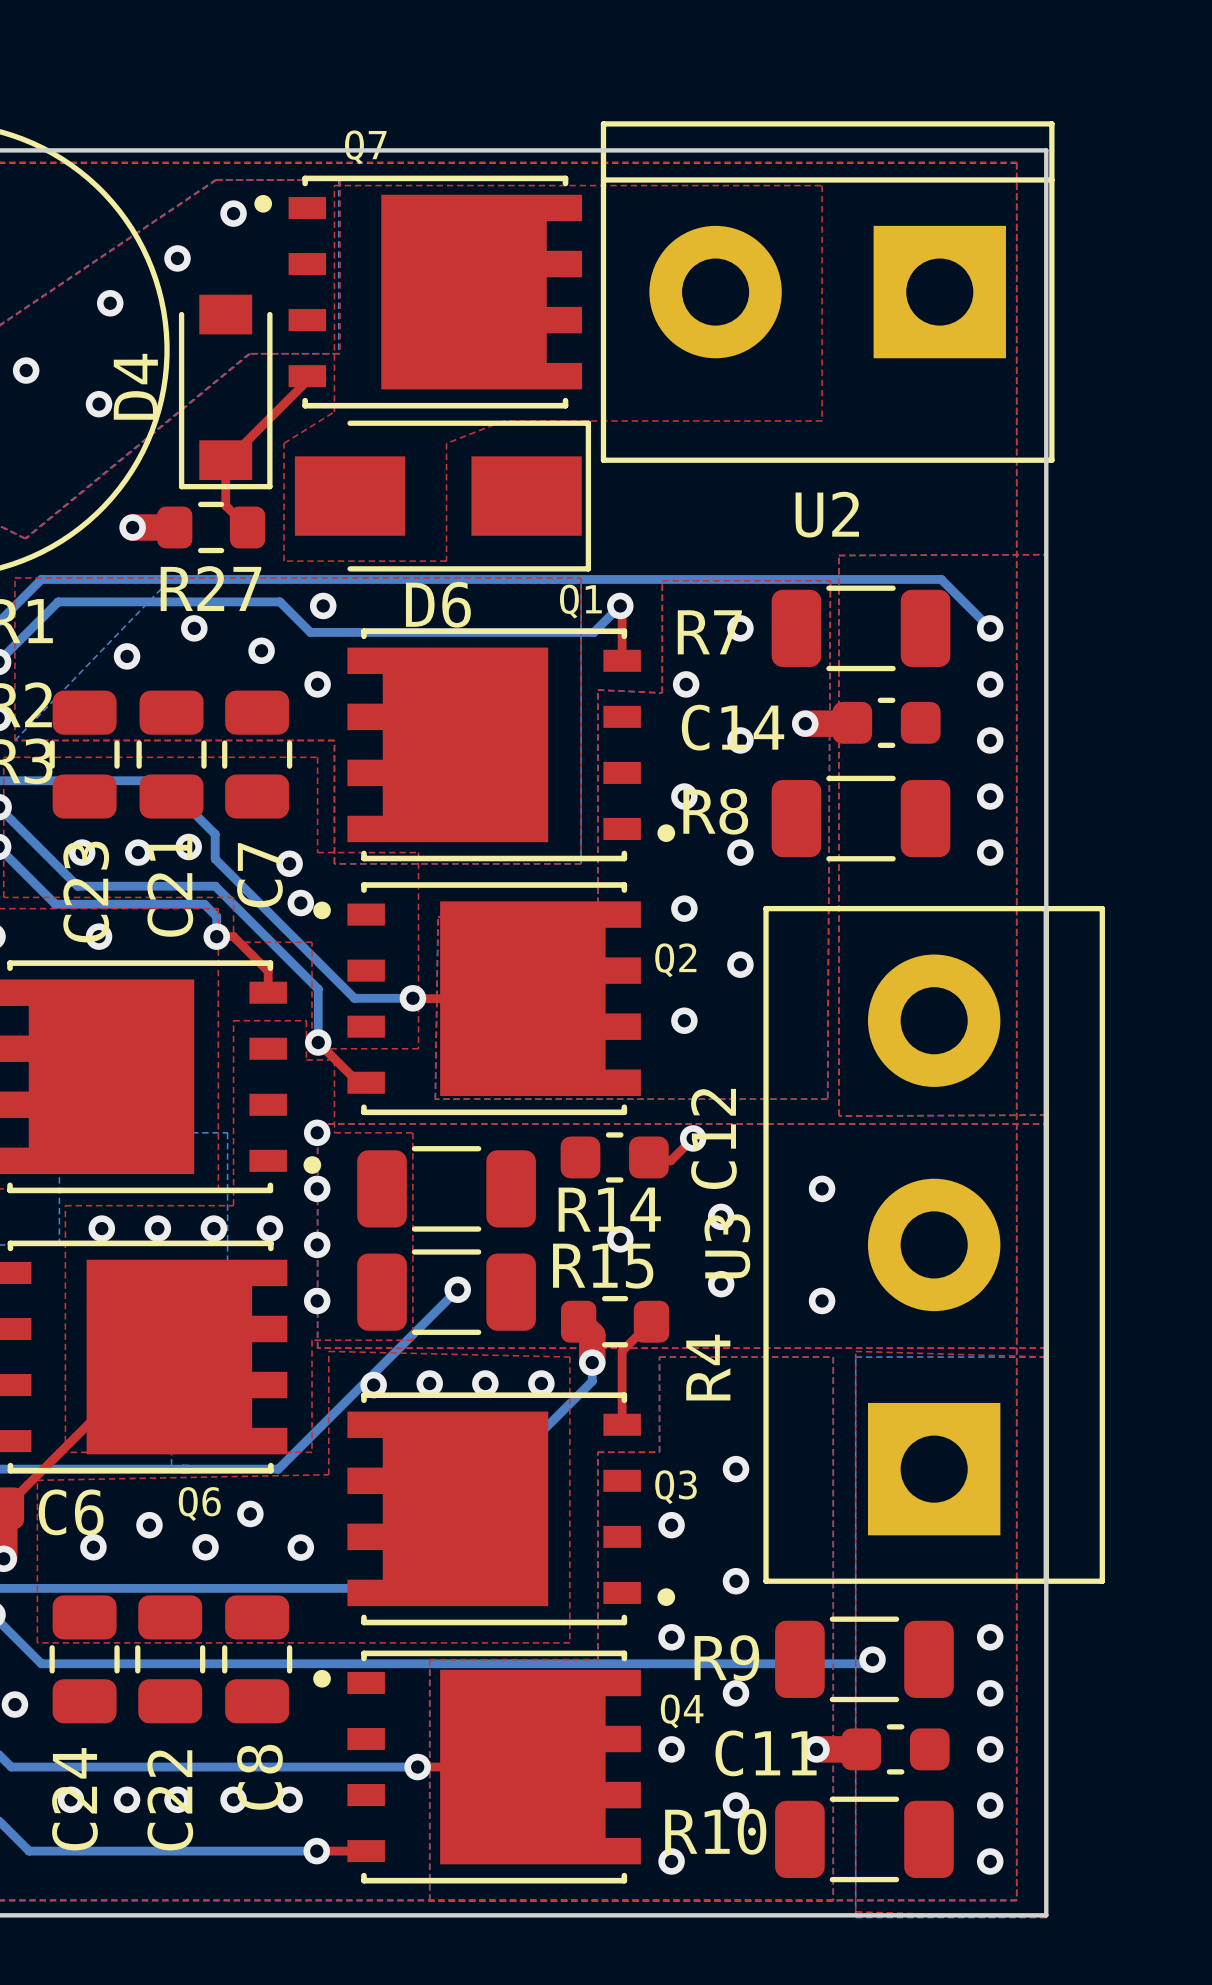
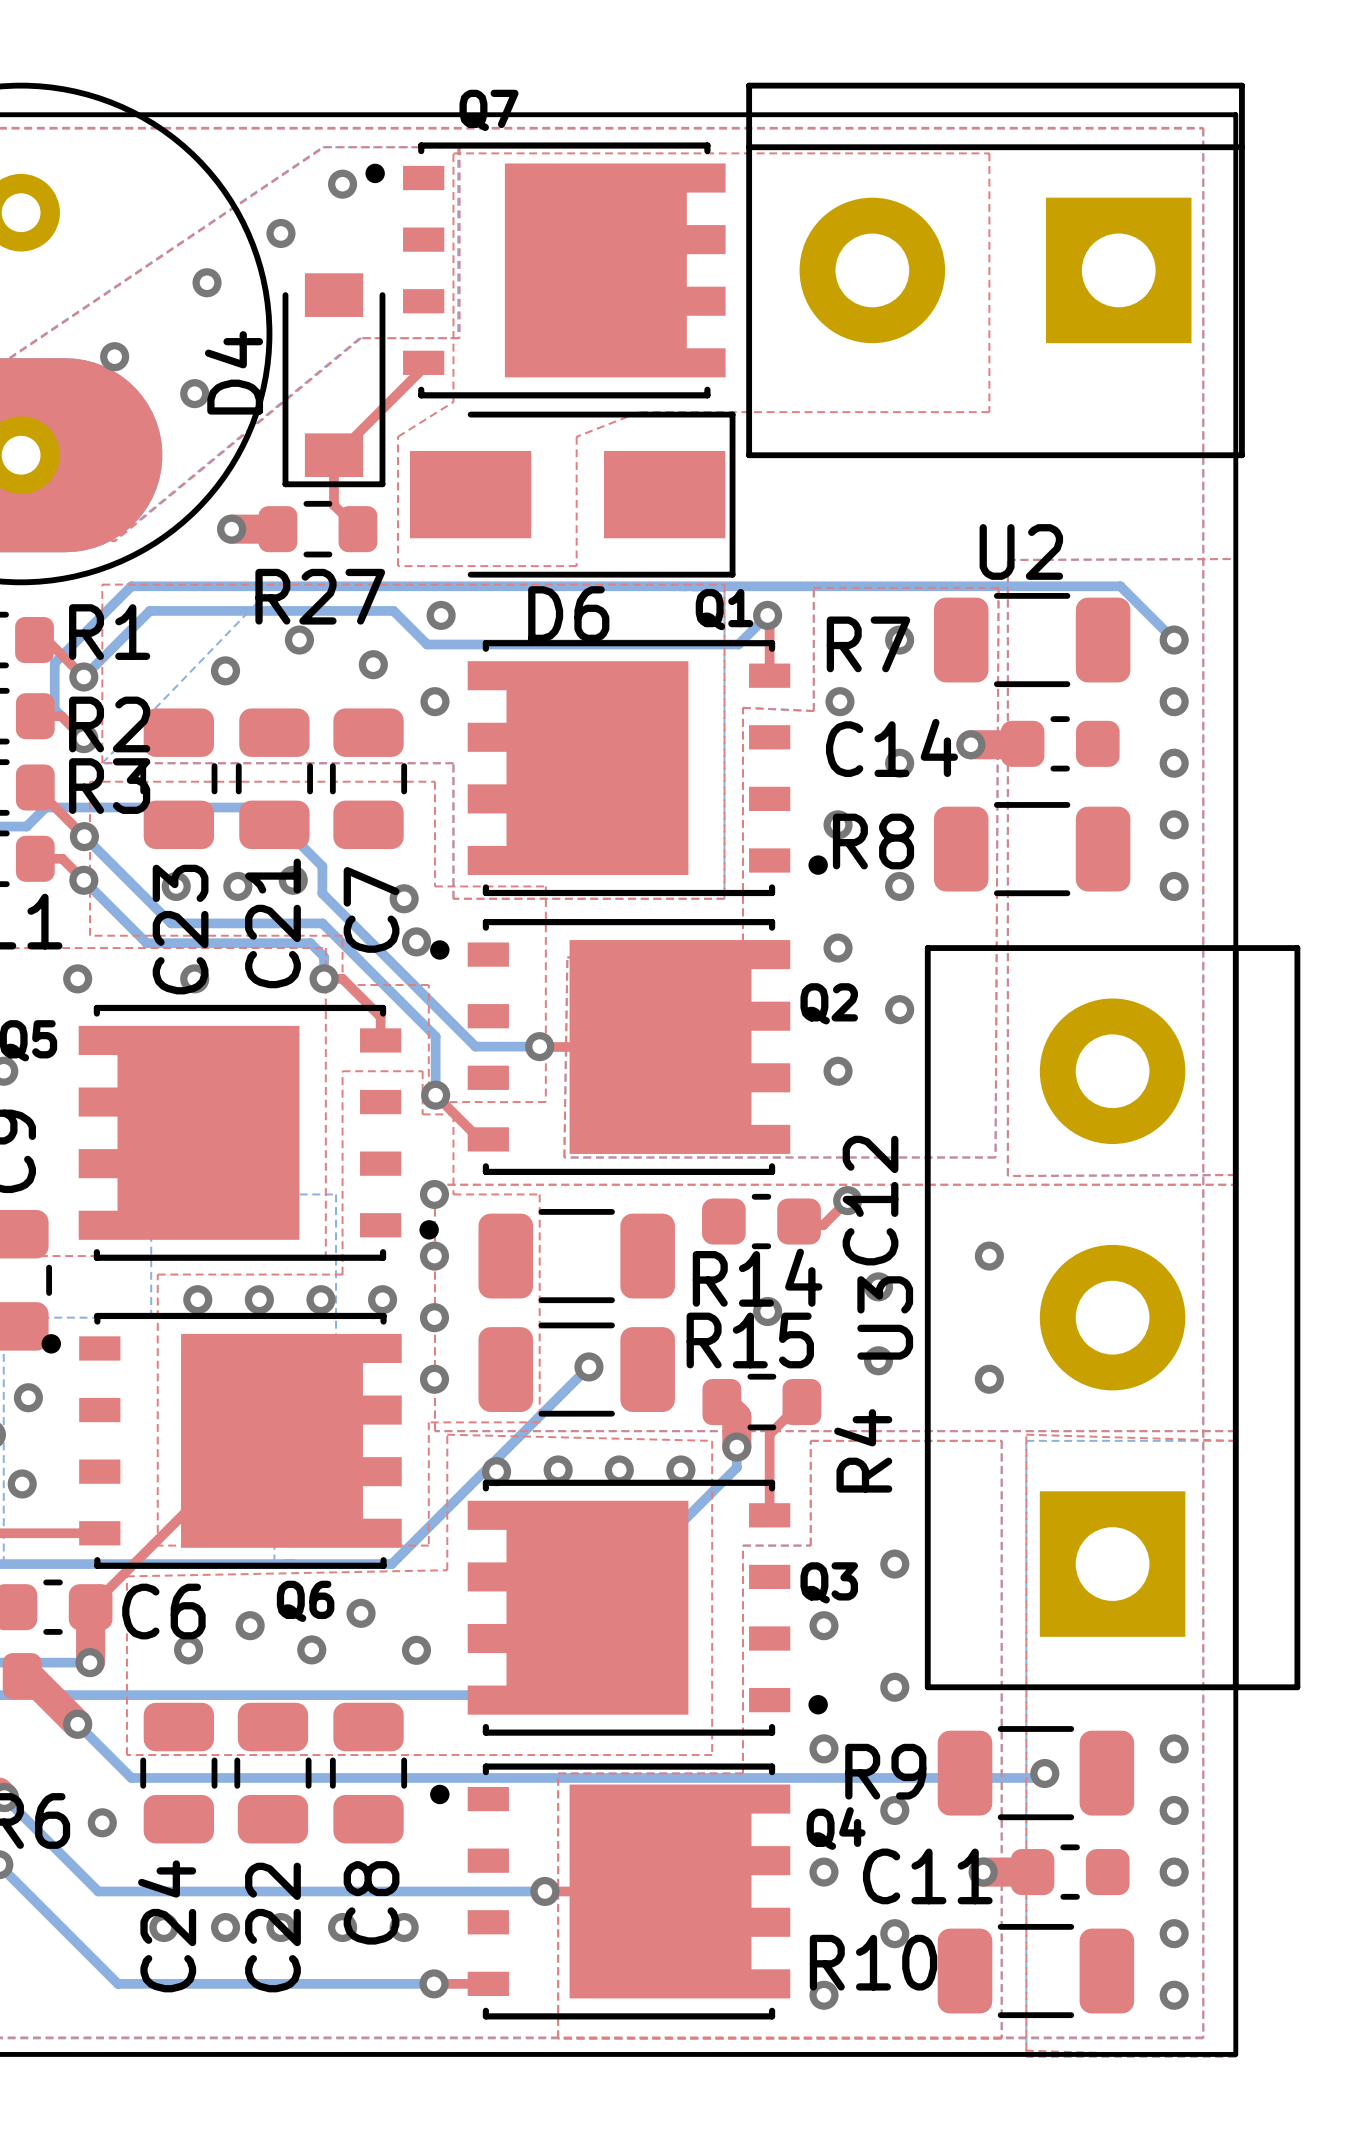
U2 name position: U2 (827, 514) -> U2 (1021, 551)

